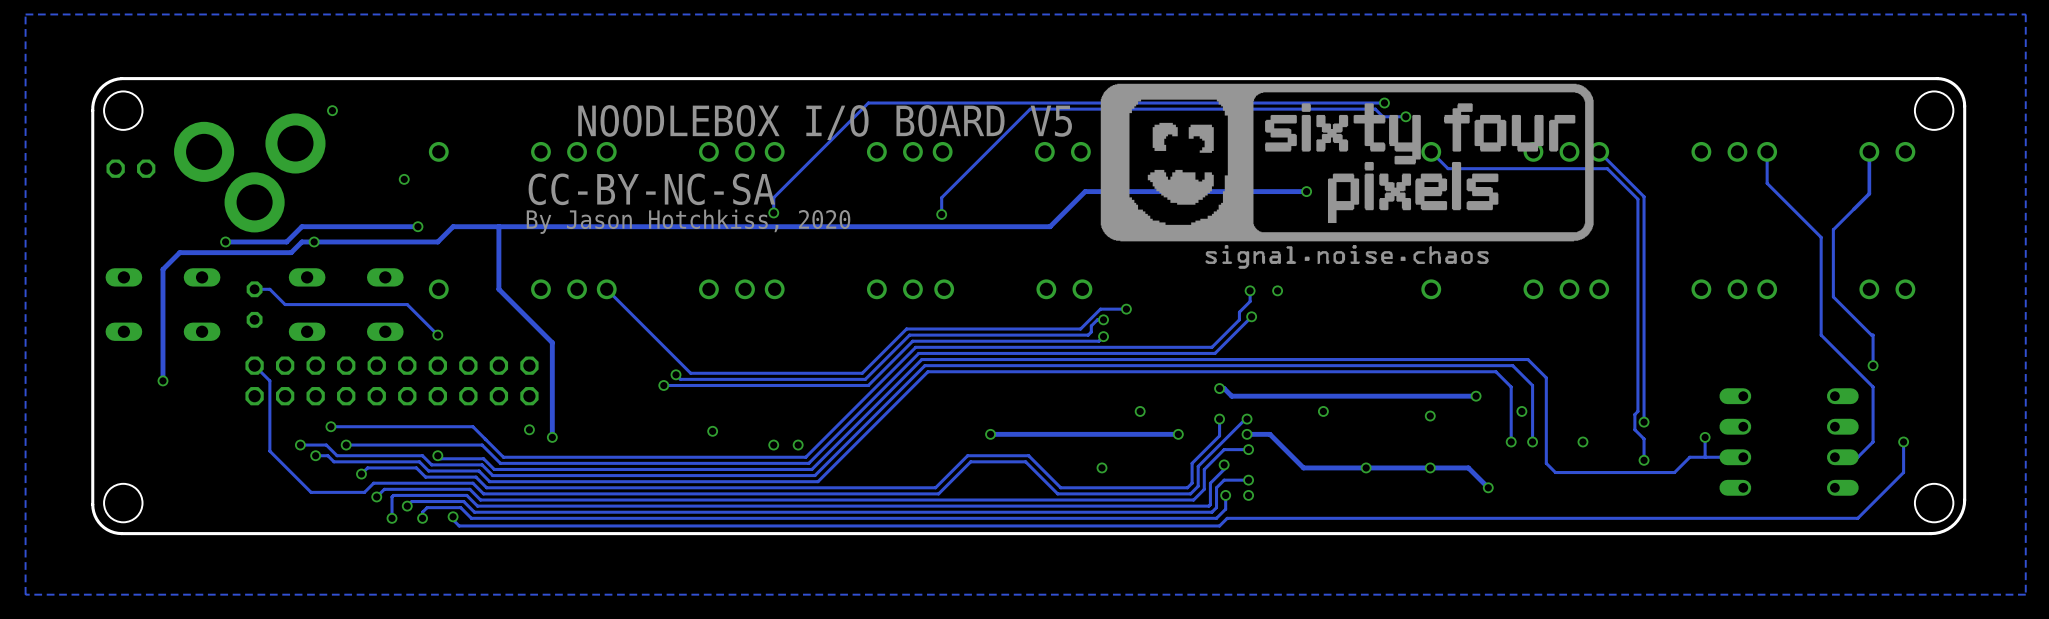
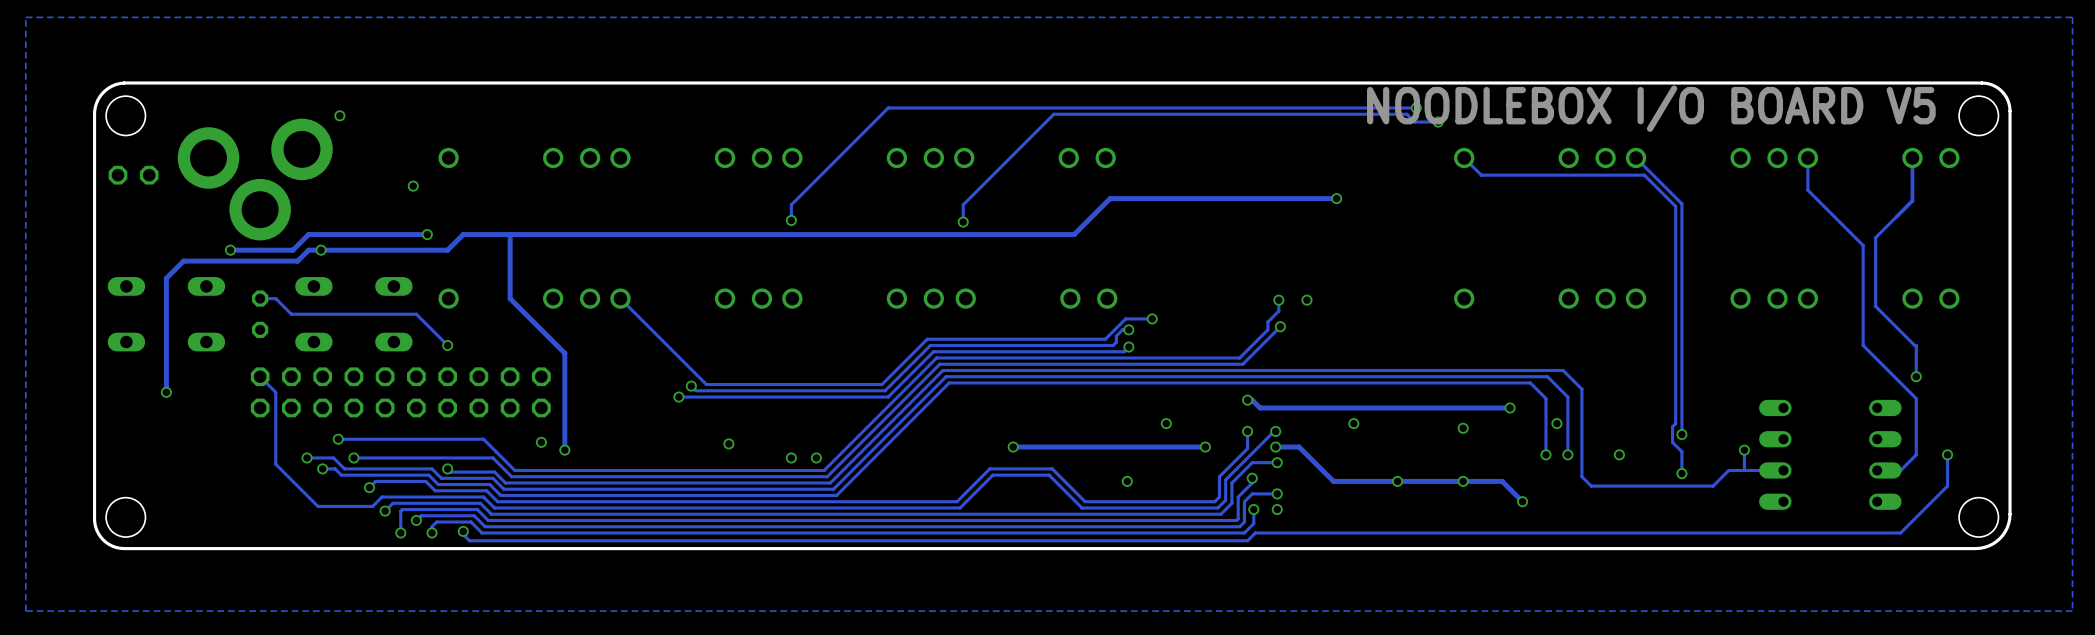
drawing: [1100, 83, 1594, 269] -> none
text: none -> NOODLEBOX I/O BOARD V5 (1651, 108)
text: NOODLEBOX I/O BOARD V5 (825, 122) -> none
text: CC-BY-NC-SA (651, 189) -> none
text: By Jason Hotchkiss, 2020 (688, 221) -> none

